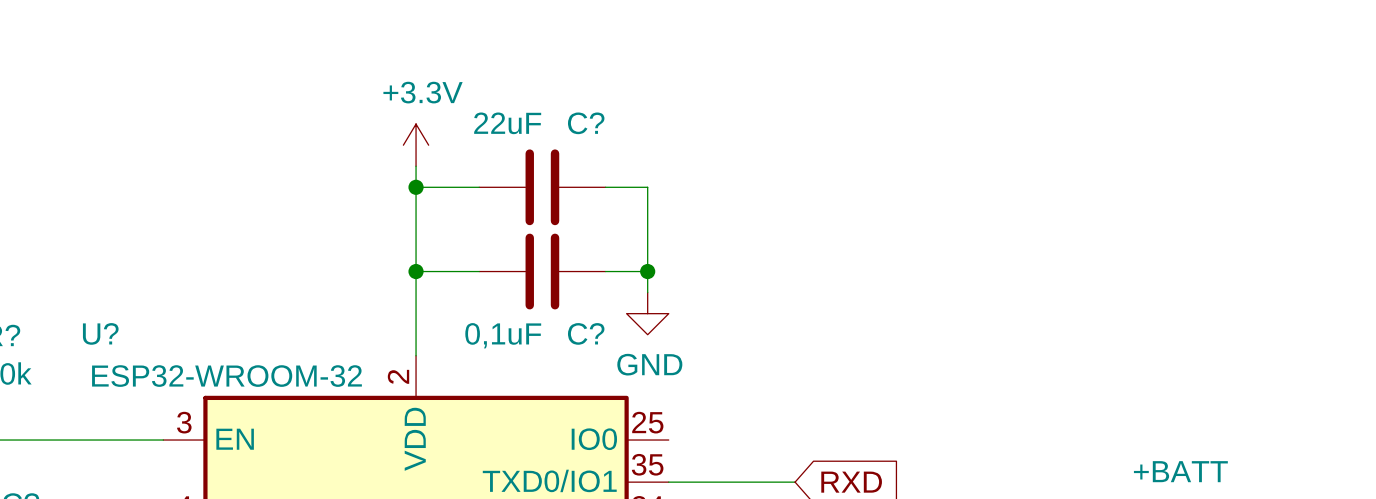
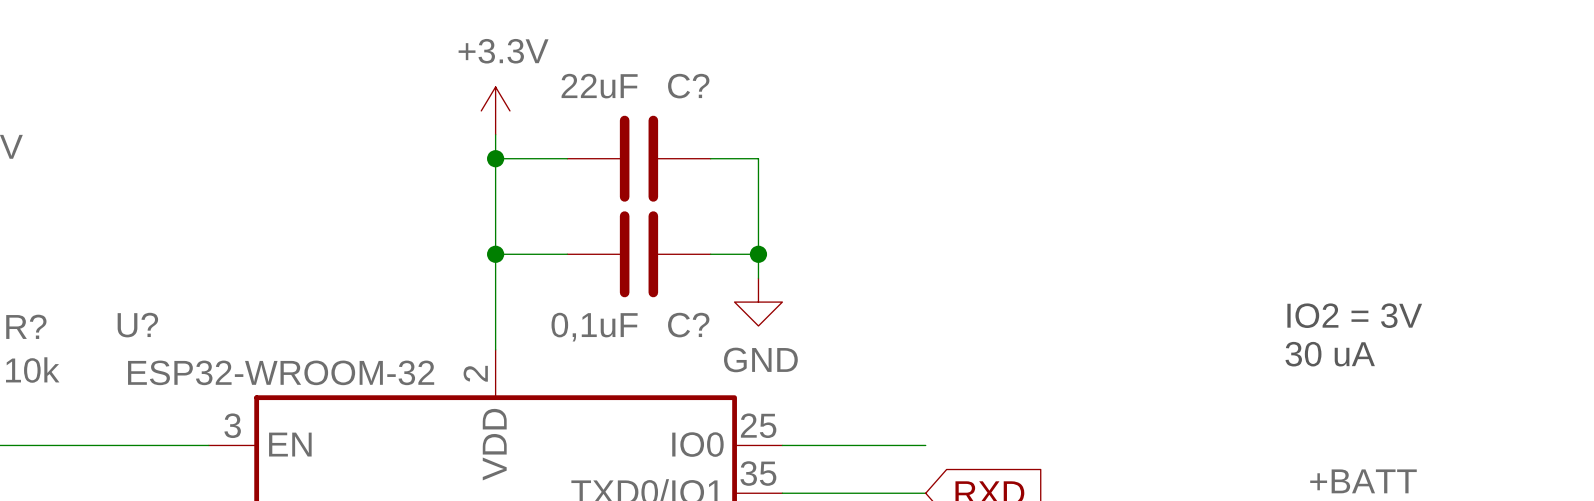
text: none -> IO2 = 3V (1354, 315)
text: none -> 30 uA (1330, 354)
wire: none -> (782, 445) (925, 445)

